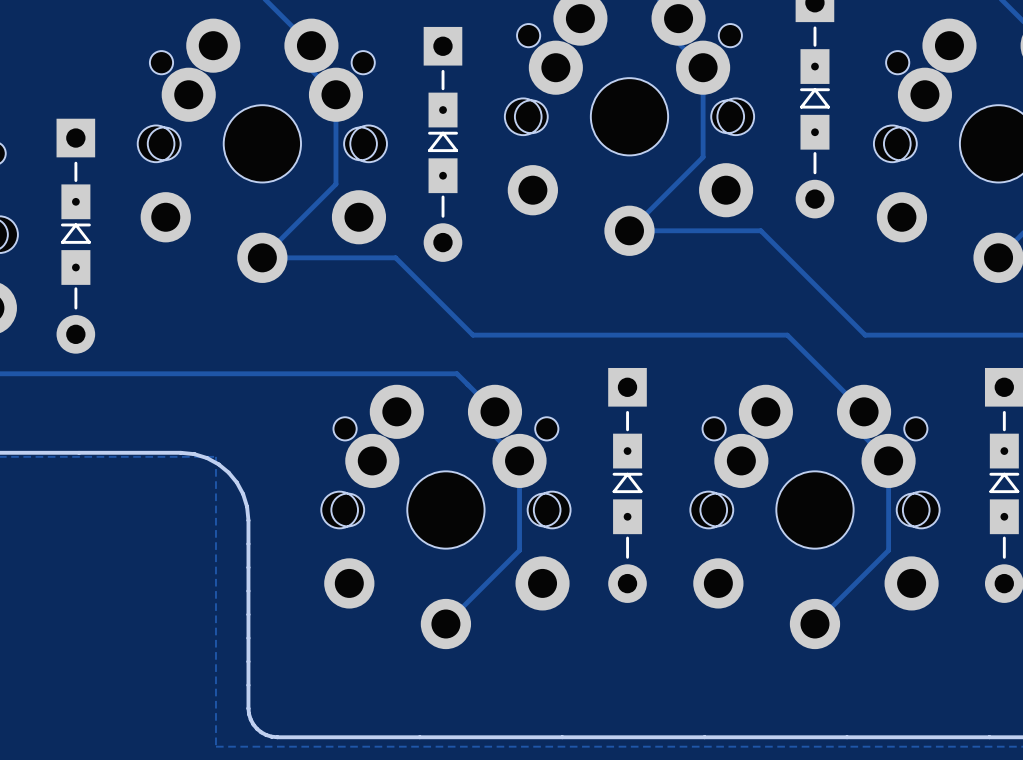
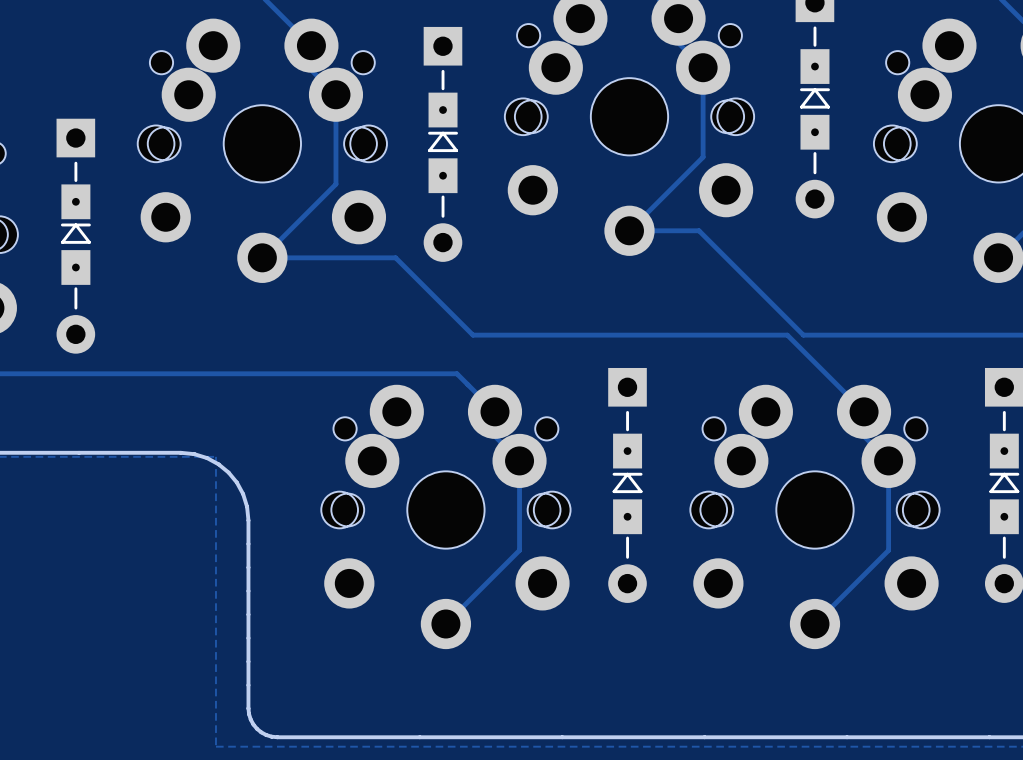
track: (699, 230) (760, 230) (865, 335) -> (699, 230) (803, 335) (865, 335)

